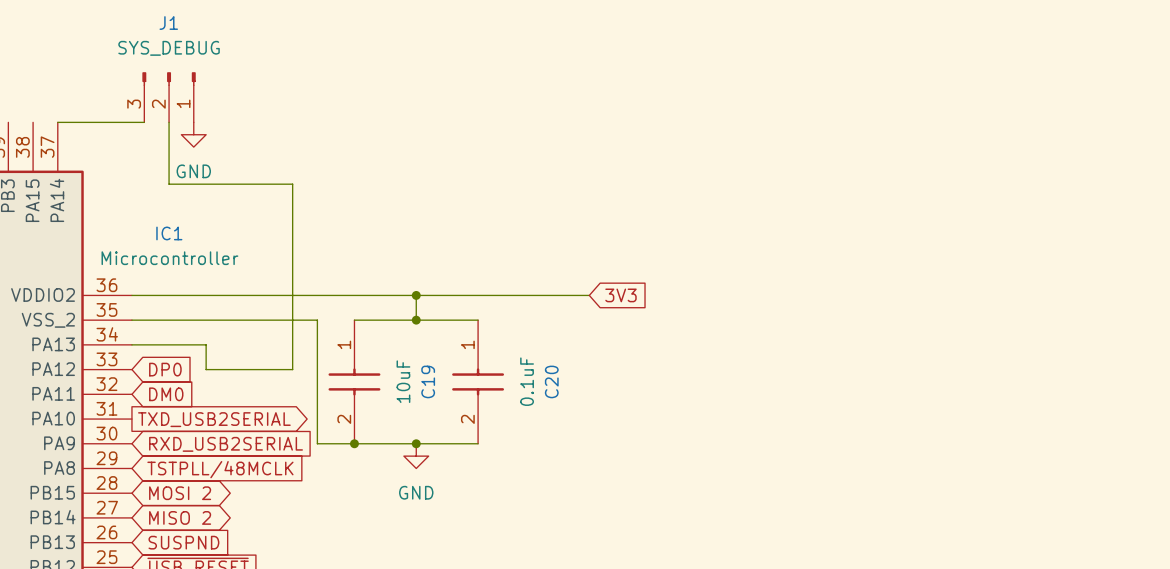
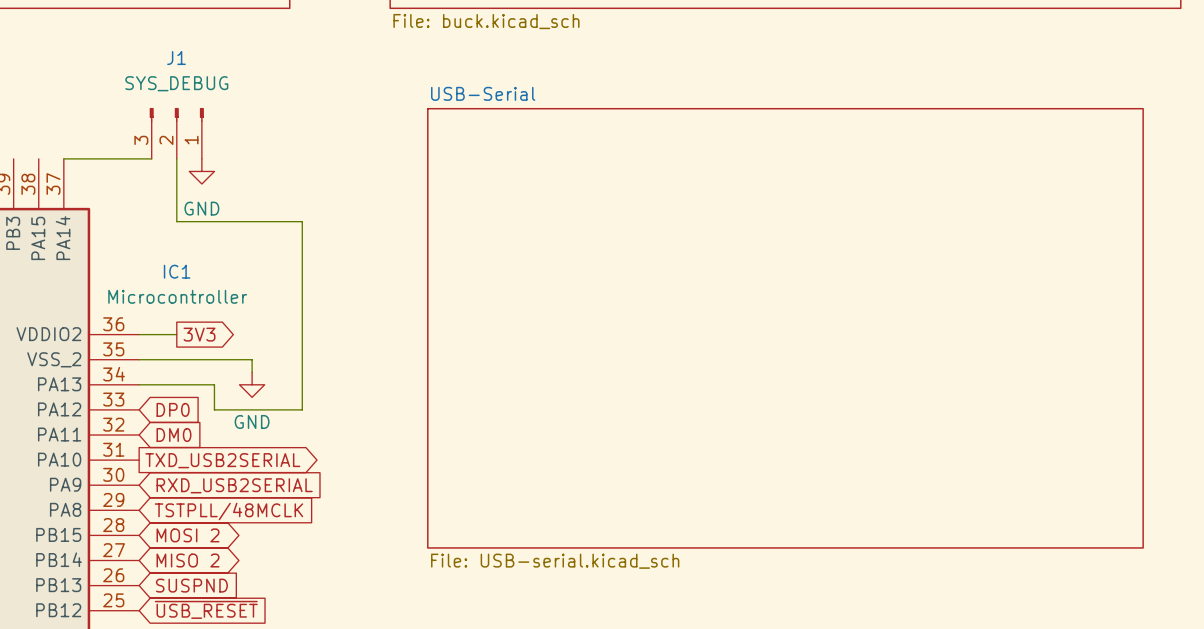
sheet USB-Serial: none -> File: USB-serial.kicad_sch (785, 328)
wire: (169, 295) (589, 295) -> none
global label: none -> 3V3 (199, 334)
junction: (416, 295) -> none
global label: 3V3 (620, 295) -> none
wire: (243, 320) (317, 320) (317, 443) (478, 443) -> (252, 359) (252, 372)
wire: (354, 320) (478, 320) -> none
junction: (416, 320) -> none
C19: 10uF (354, 381) -> none
C20: 0.1uF (478, 381) -> none
junction: (354, 443) -> none
junction: (416, 443) -> none
power symbol position: GND (416, 456) -> GND (252, 384)

